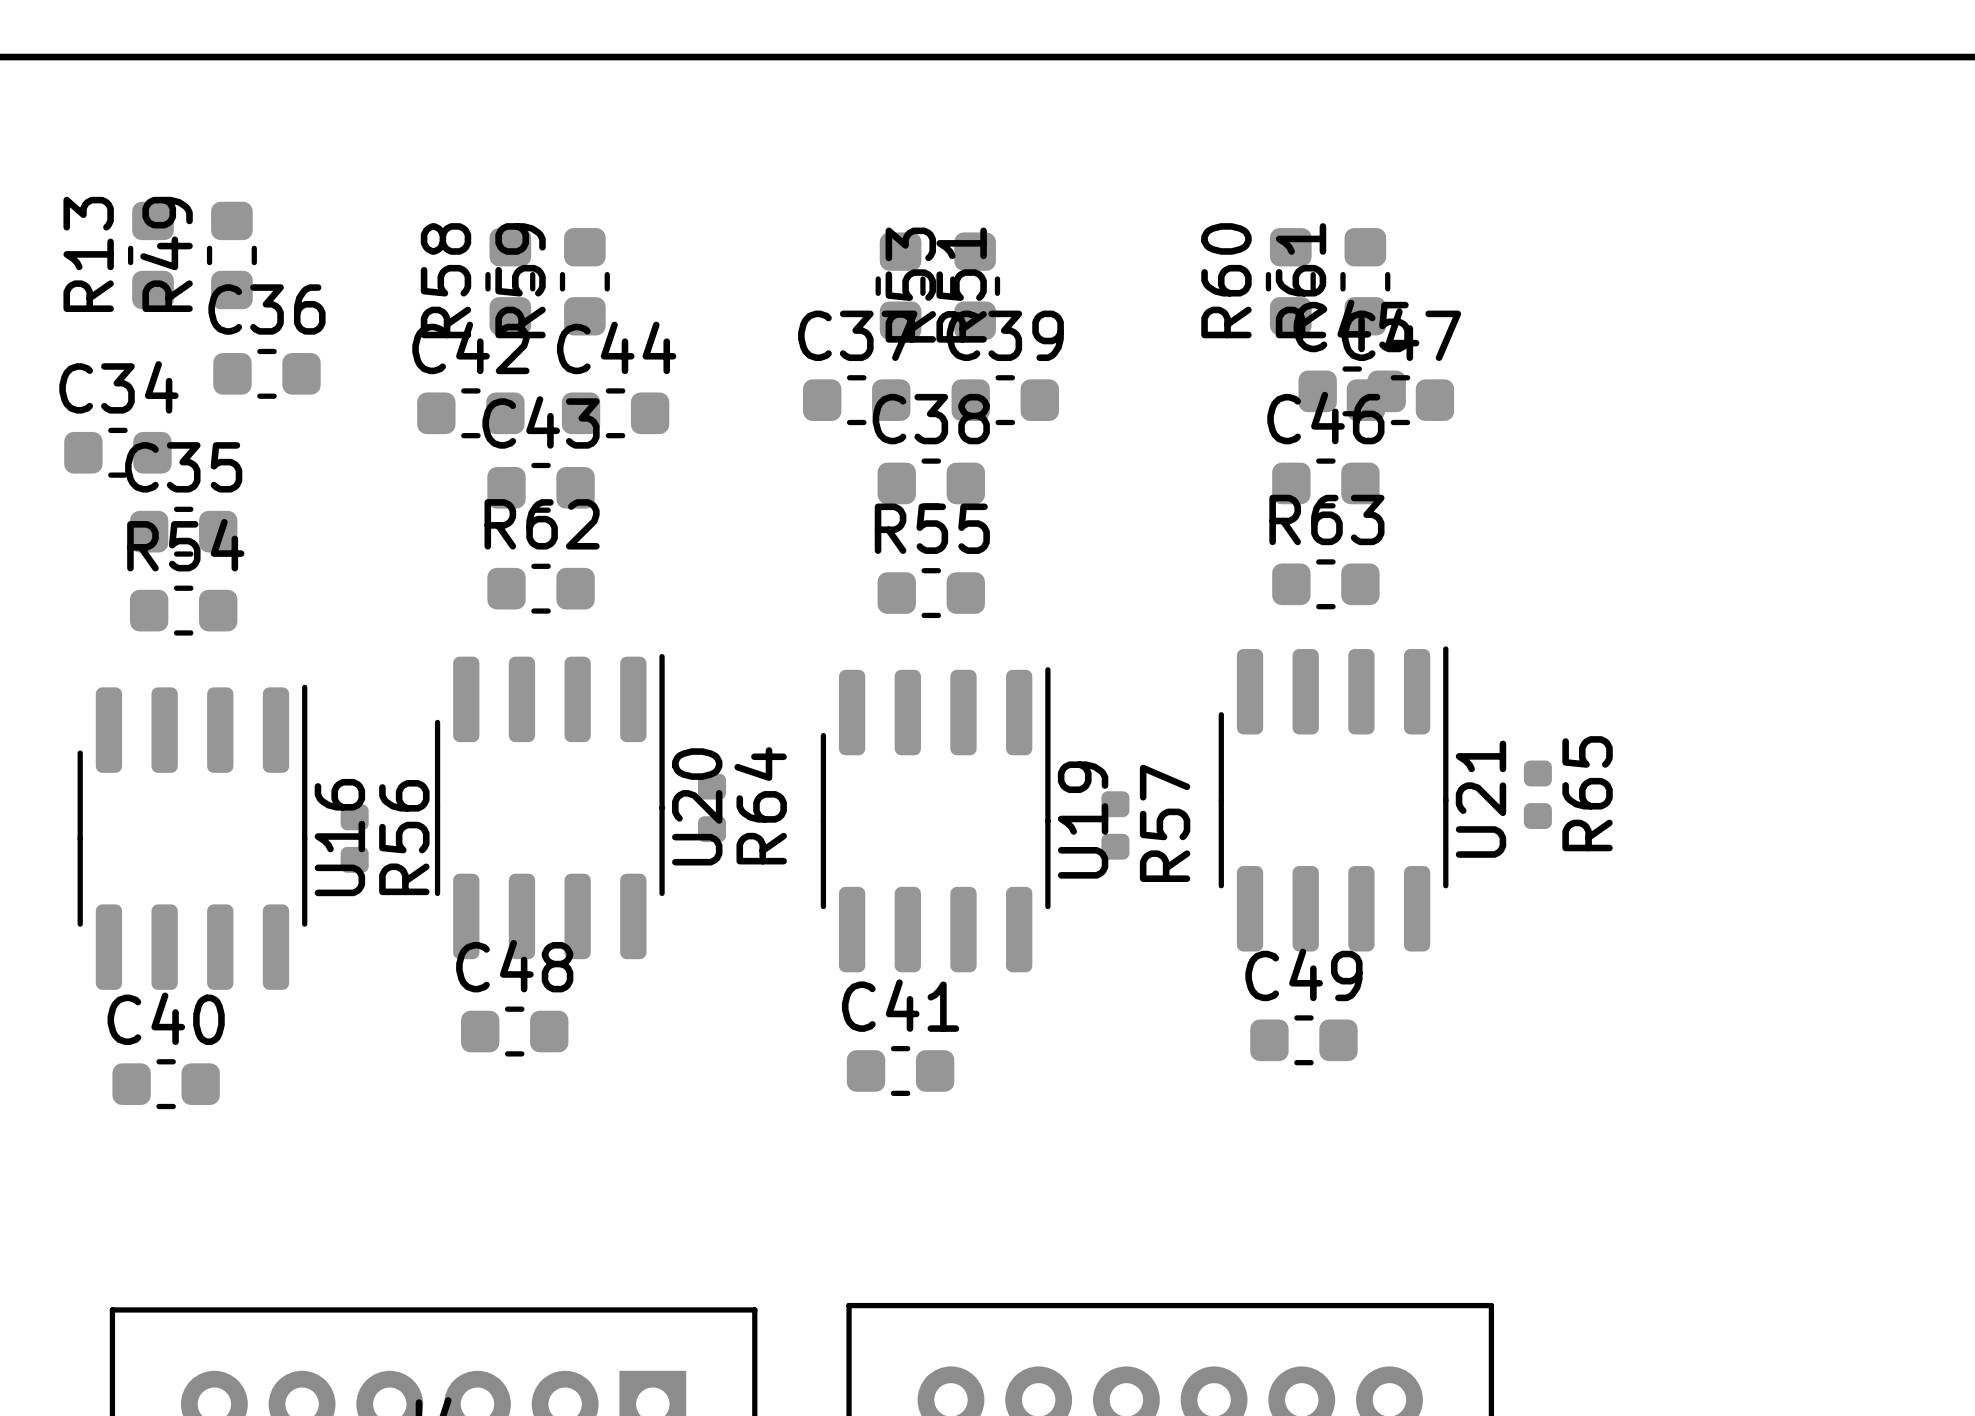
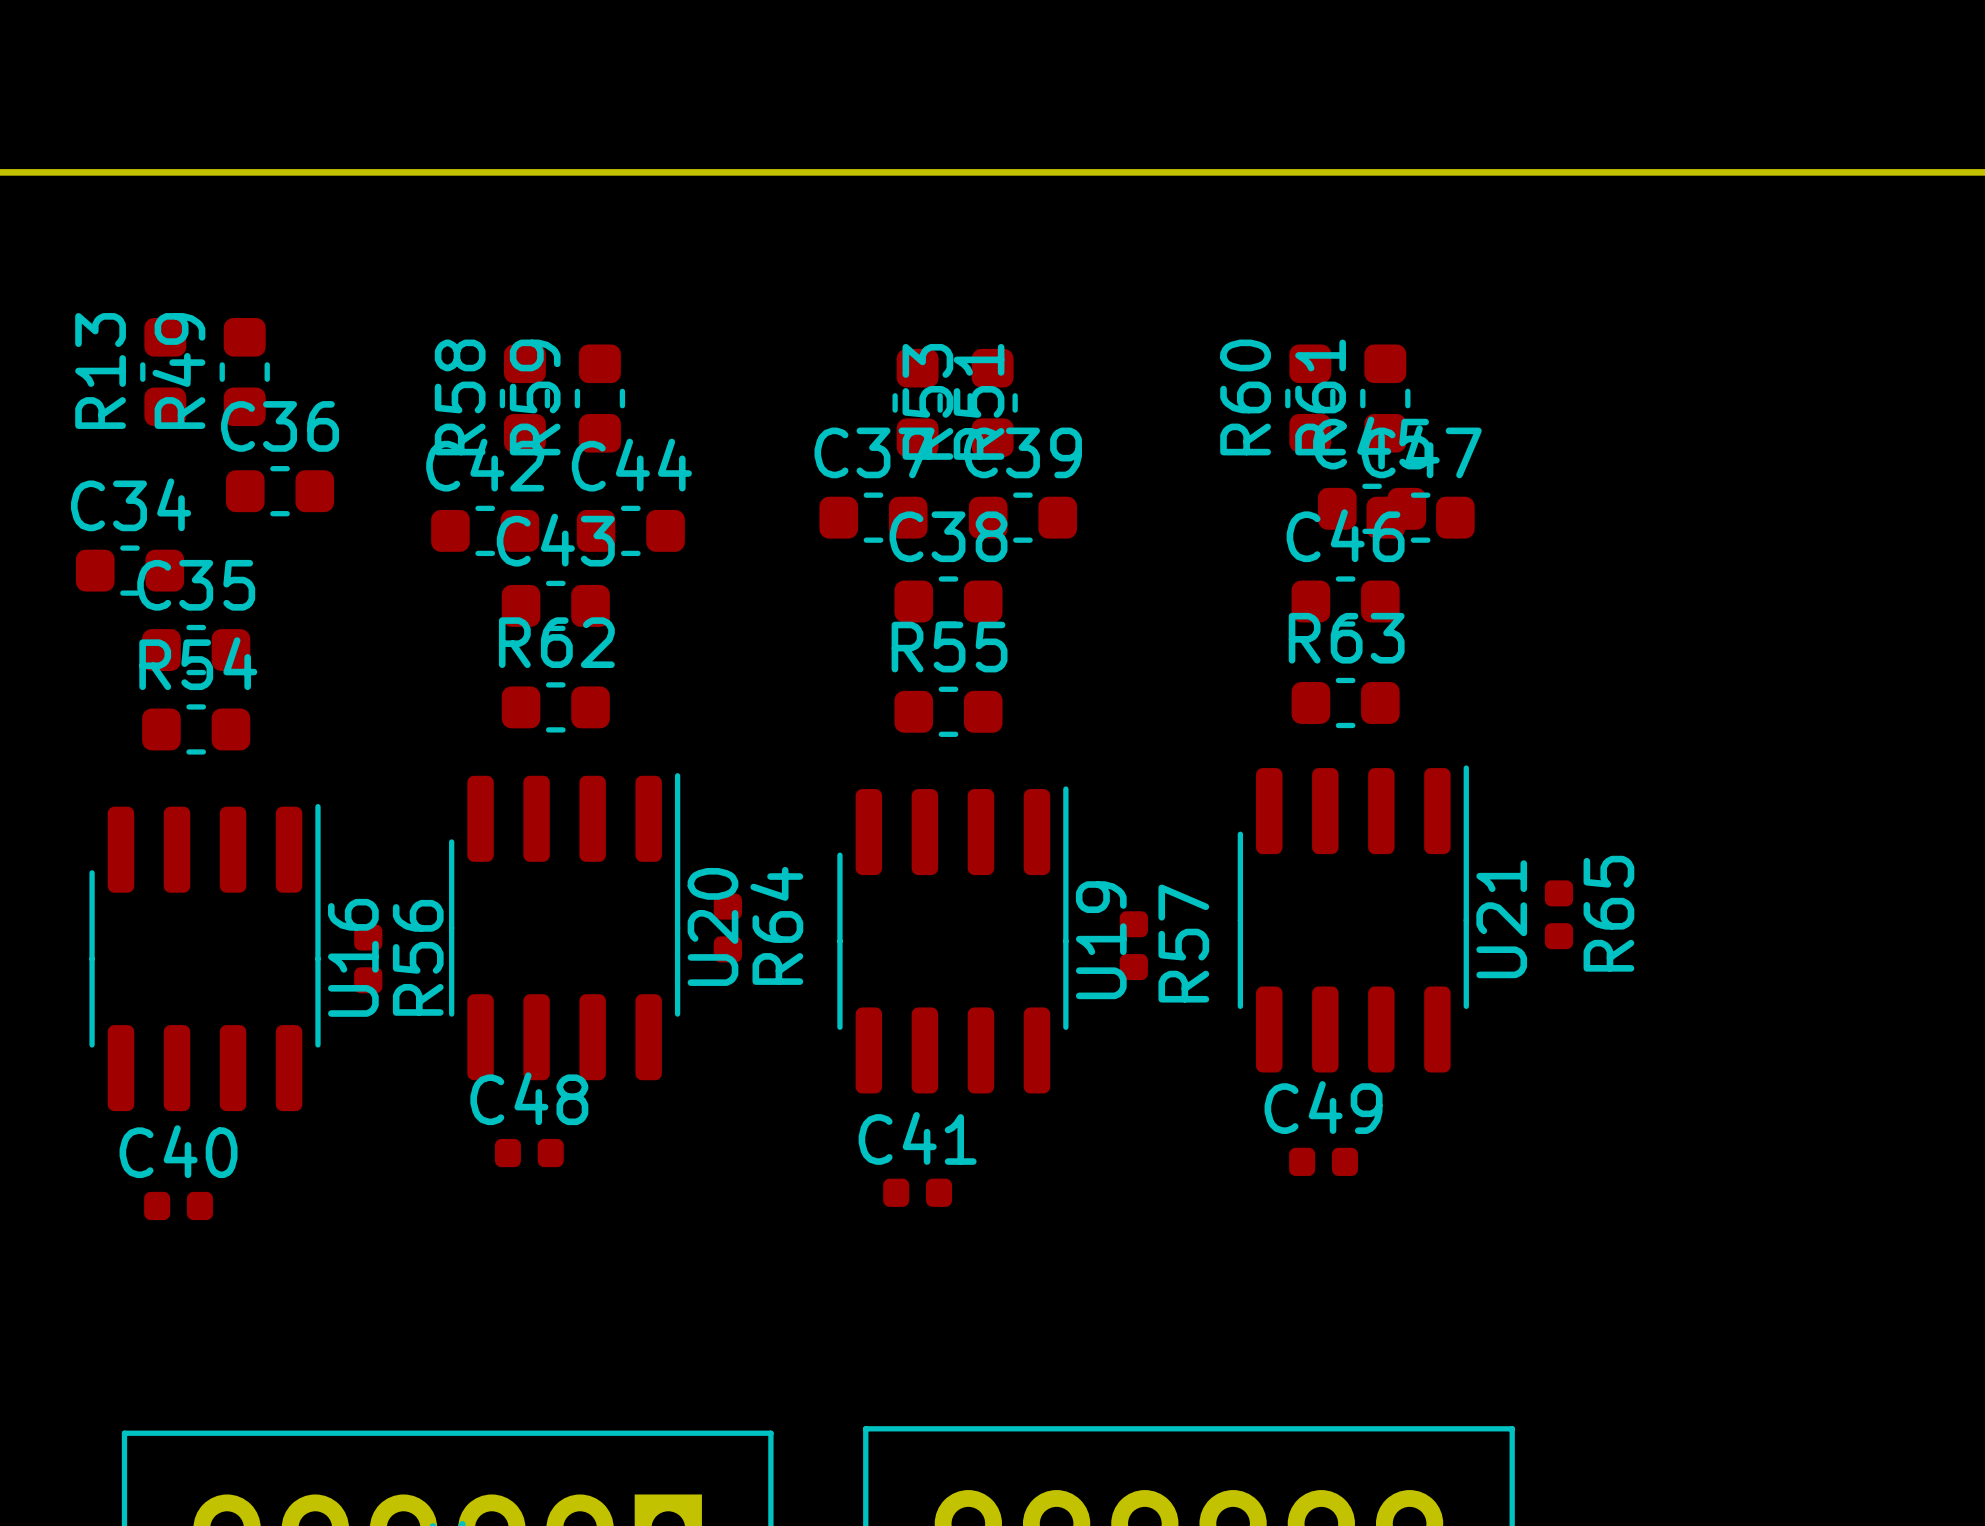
C48 footprint: [461, 1006, 569, 1057] -> [494, 1138, 564, 1168]
C49 footprint: [1250, 1015, 1358, 1066] -> [1289, 1147, 1358, 1176]
C41 footprint: [846, 1046, 955, 1096] -> [883, 1178, 953, 1207]
C40 footprint: [112, 1059, 220, 1110] -> [144, 1191, 213, 1221]

